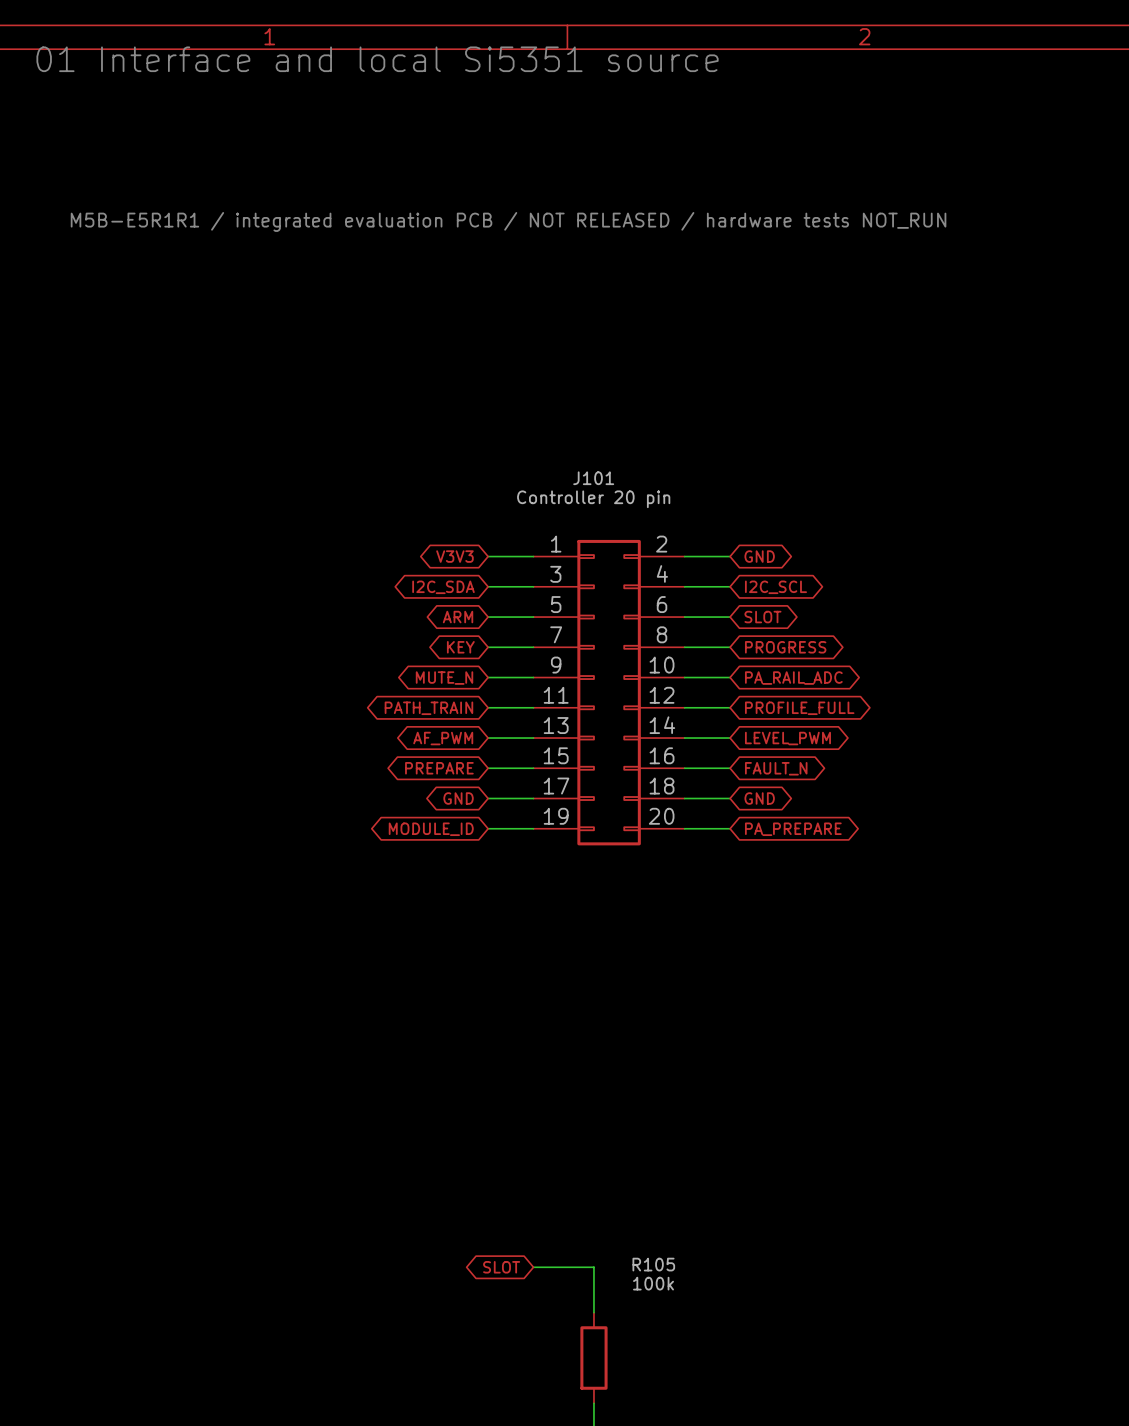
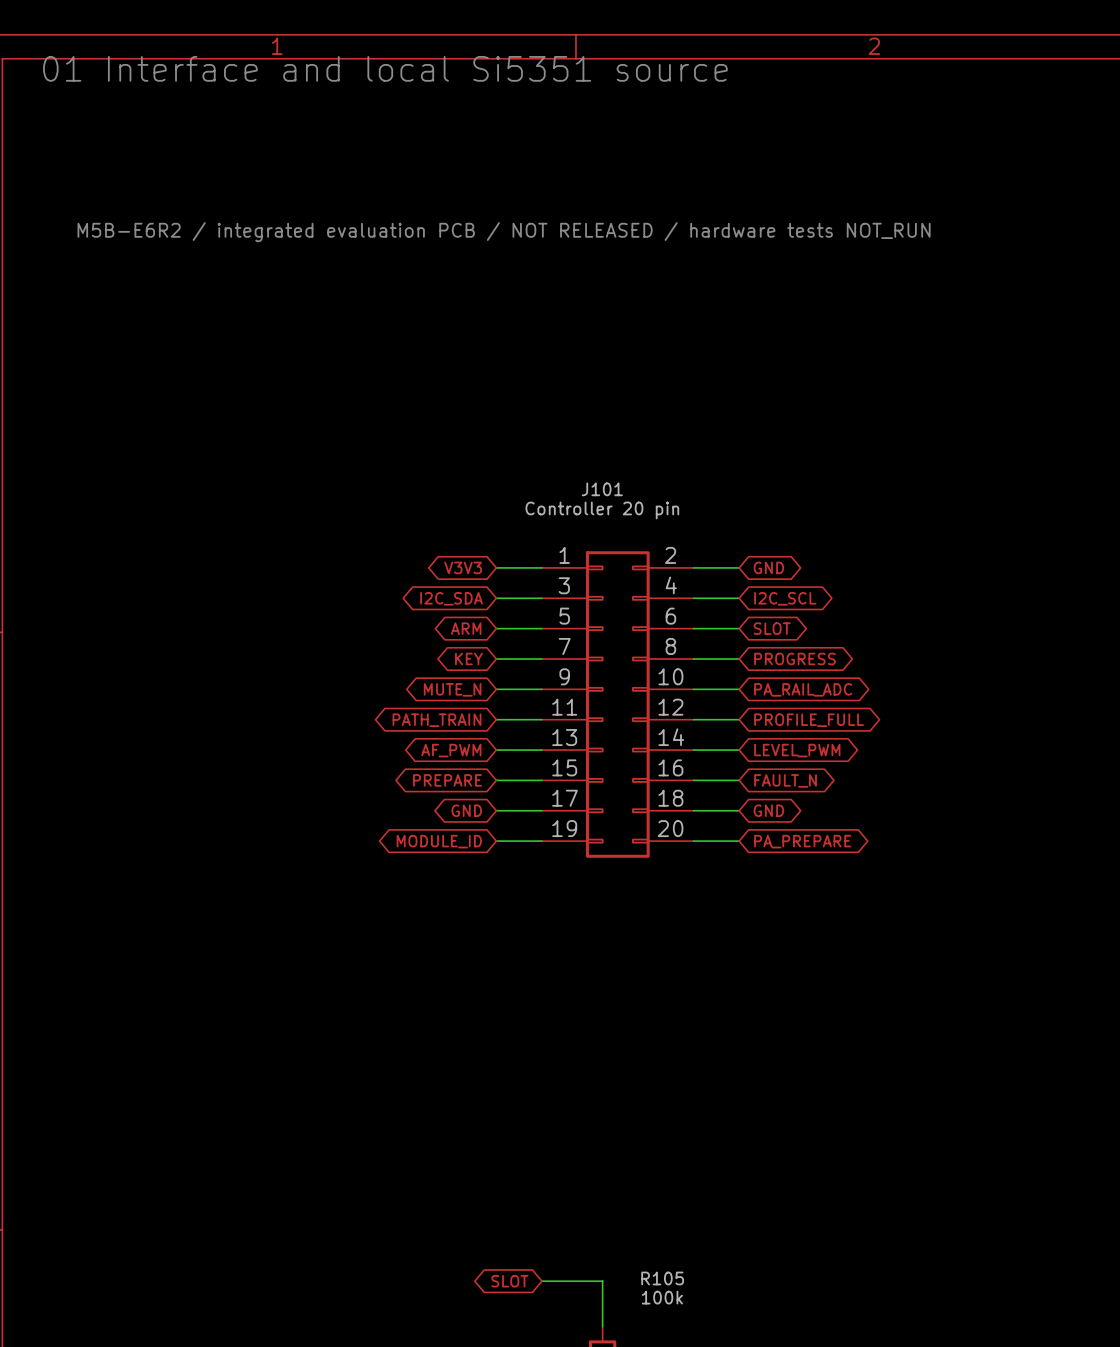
text: M5B-E5R1R1 / integrated evaluation PCB / NOT RELEASED / hardware tests NOT_RUN (508, 221) -> M5B-E6R2 / integrated evaluation PCB / NOT RELEASED / hardware tests NOT_RUN (504, 232)

